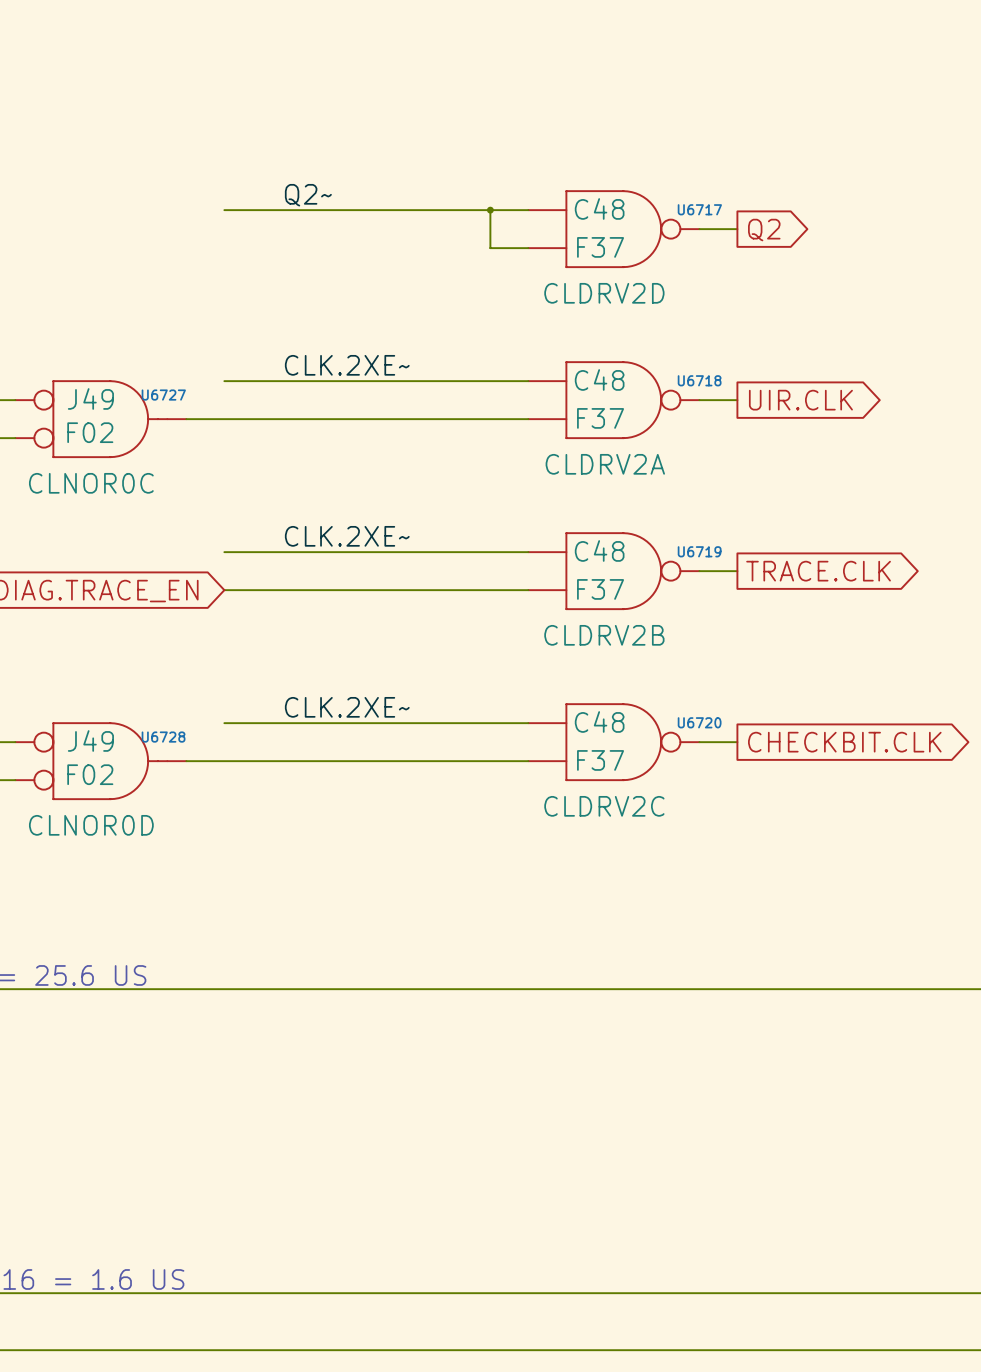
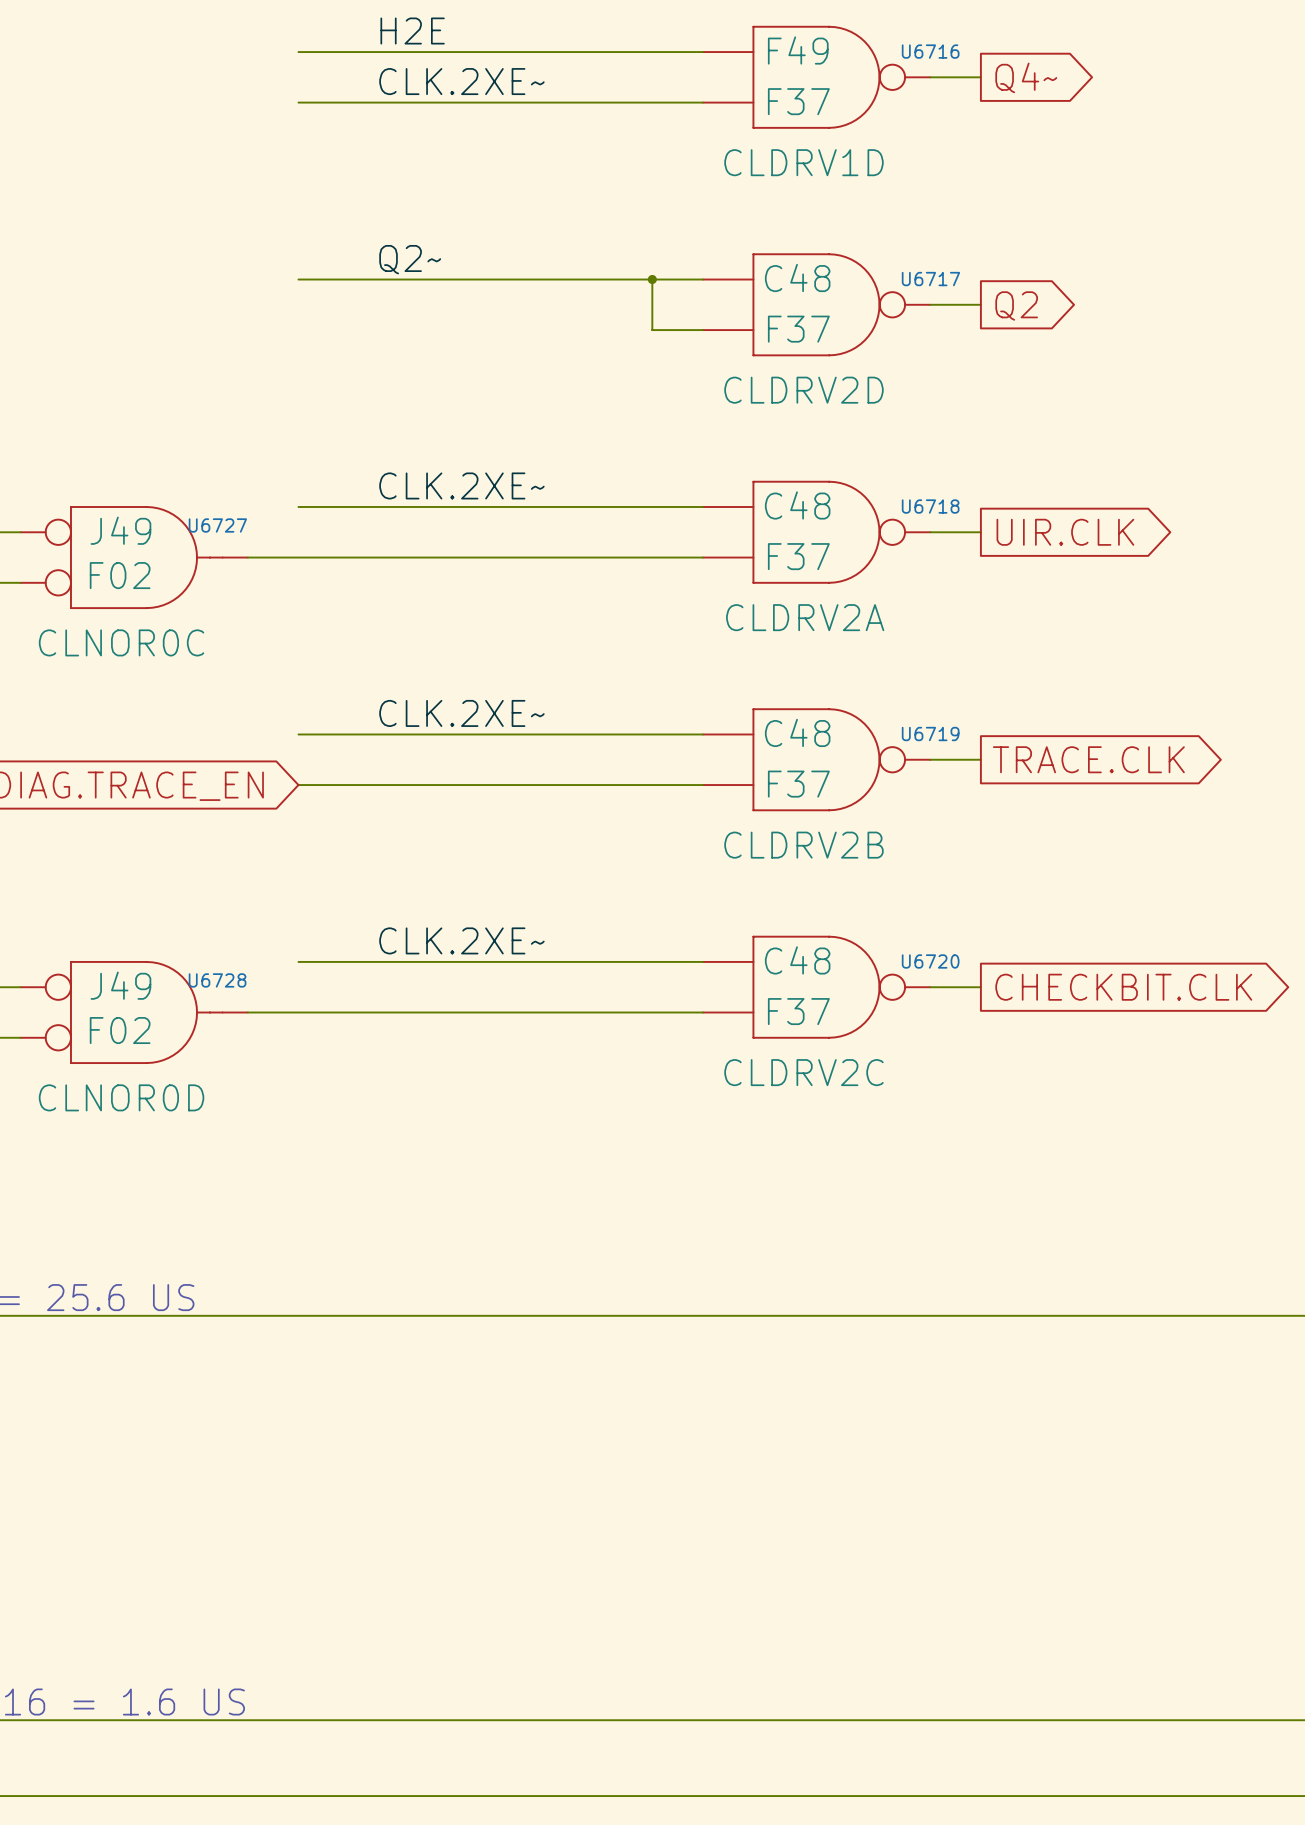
label: none -> H2E (412, 31)
wire: none -> (298, 52) (702, 52)
U6716: none -> F37 (816, 77)
wire: none -> (930, 77) (980, 77)
global label: none -> Q4~ (1026, 77)
label: none -> CLK.2XE~ (461, 81)
wire: none -> (298, 102) (702, 102)

